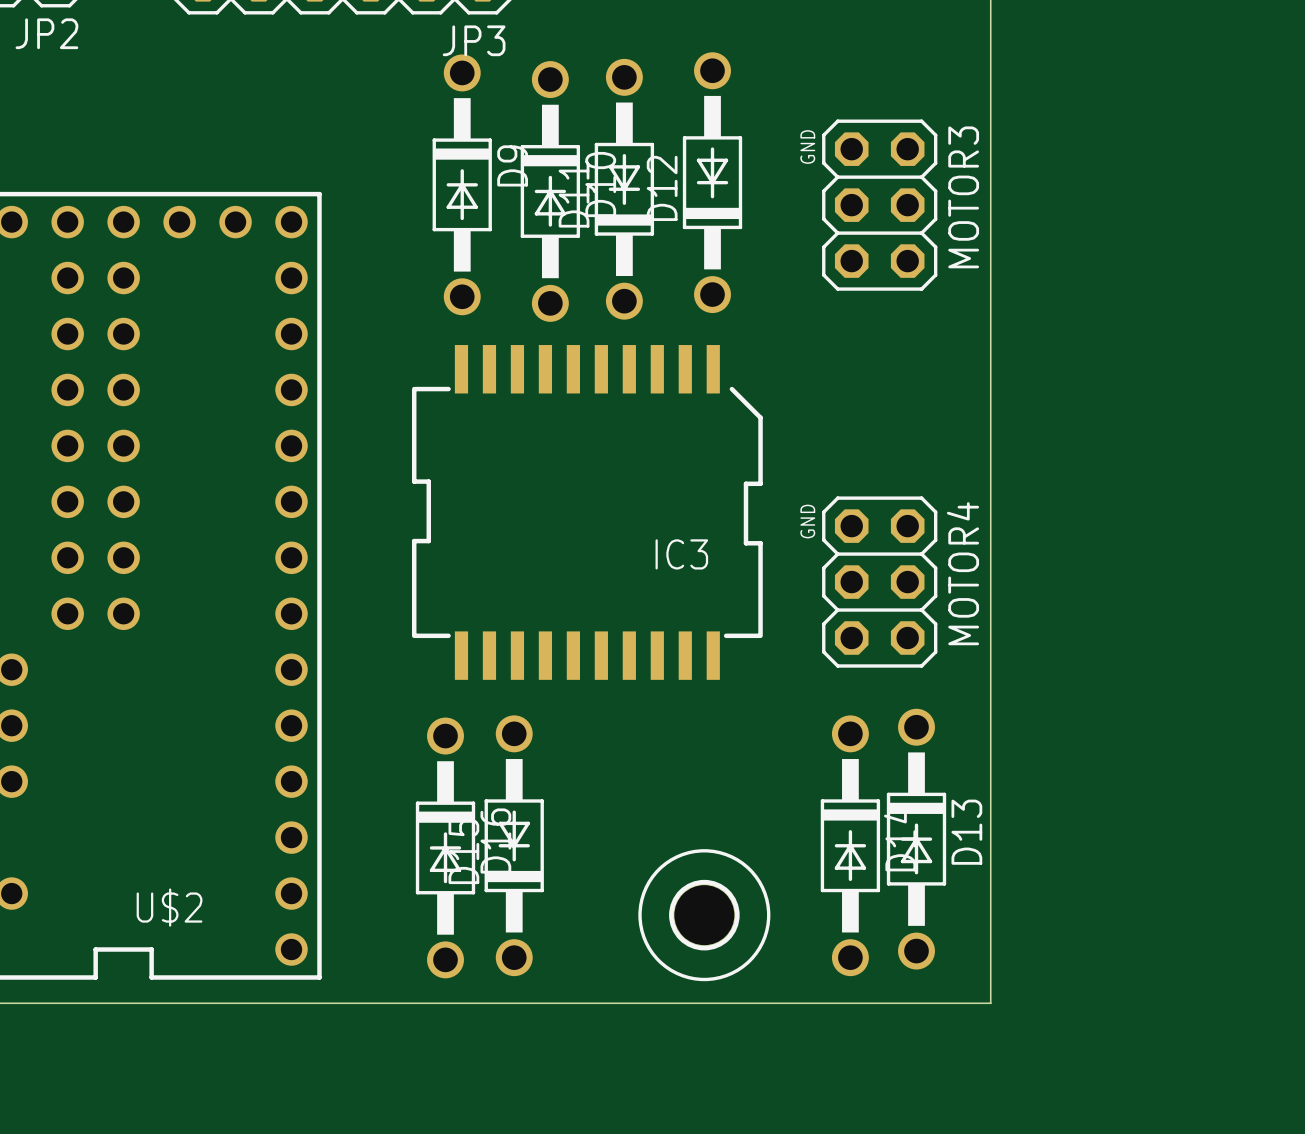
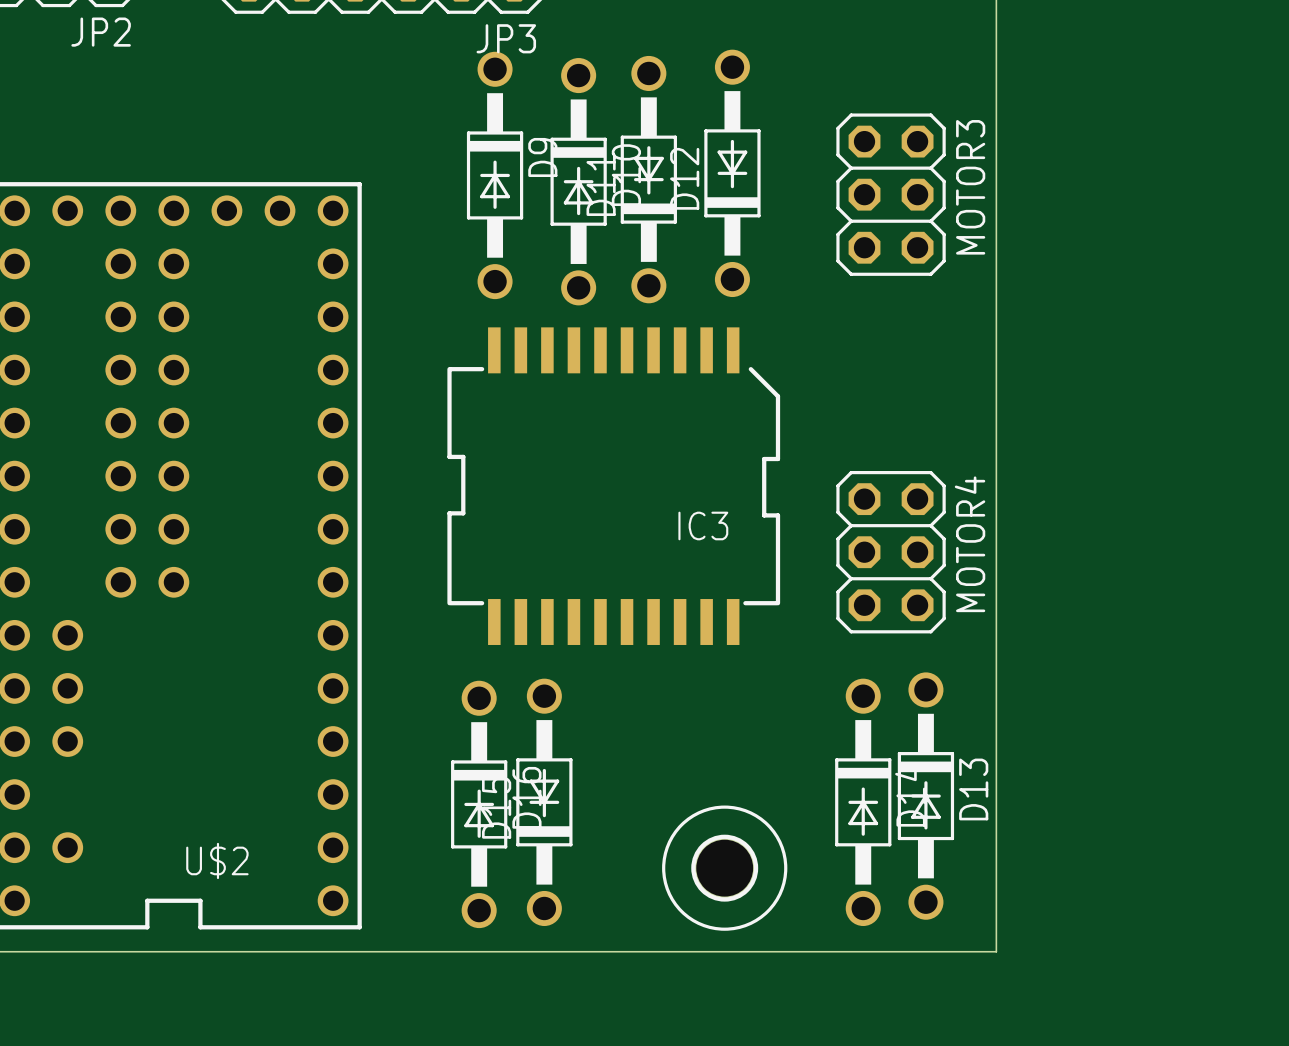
text: GND (807, 147) -> none
text: GND (807, 521) -> none

